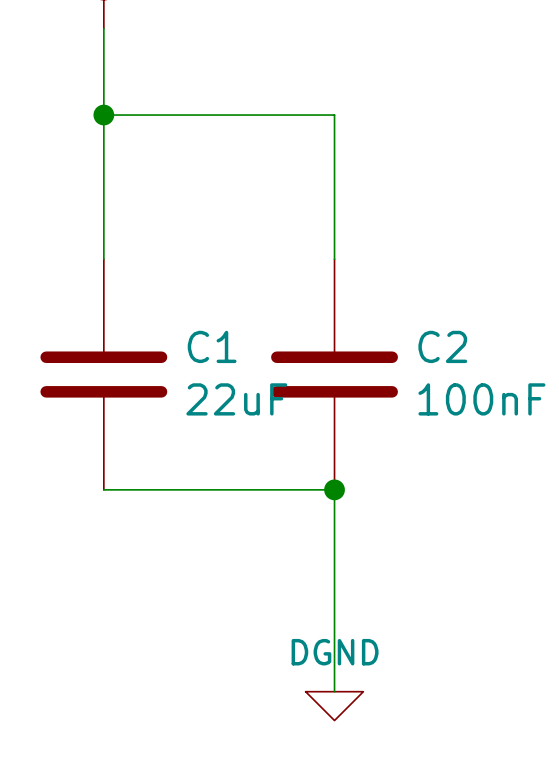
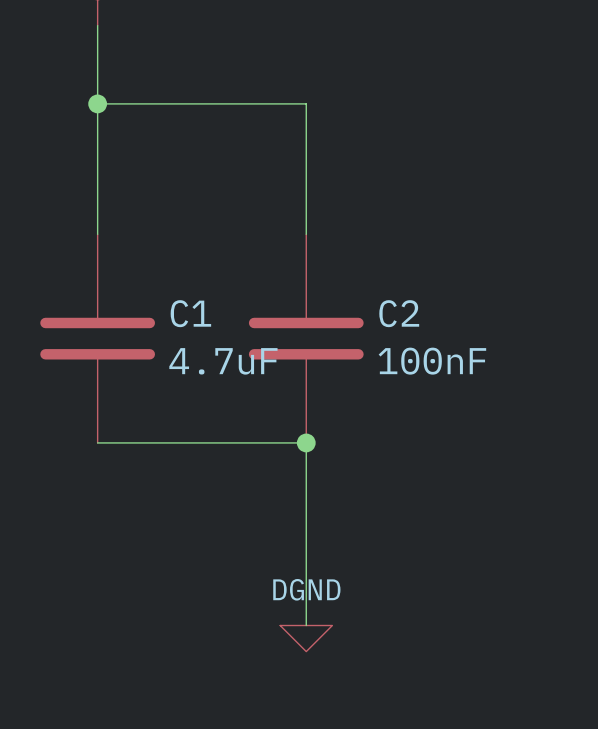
C1 value: 22uF (236, 399) -> 4.7uF (223, 361)

